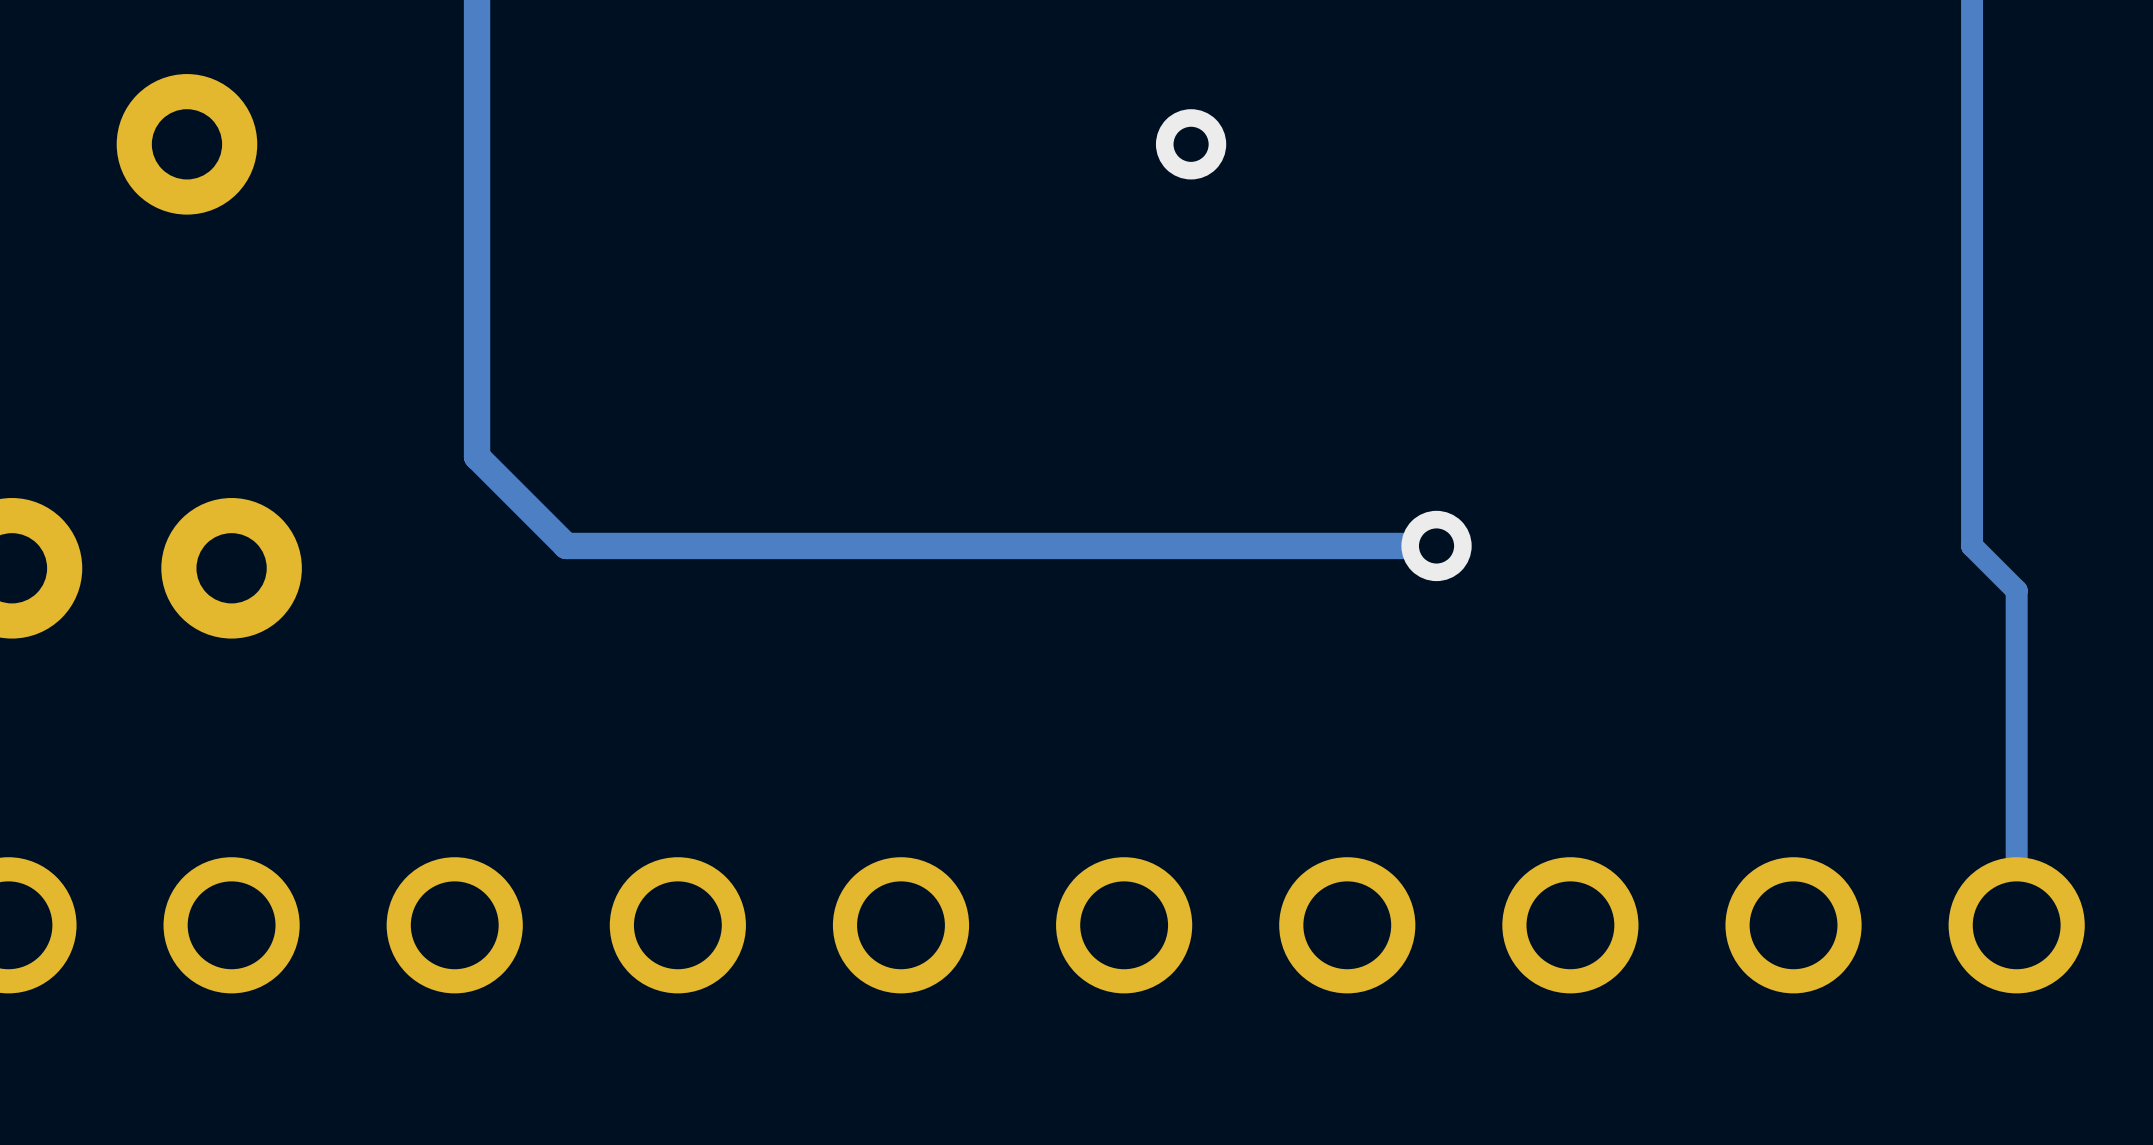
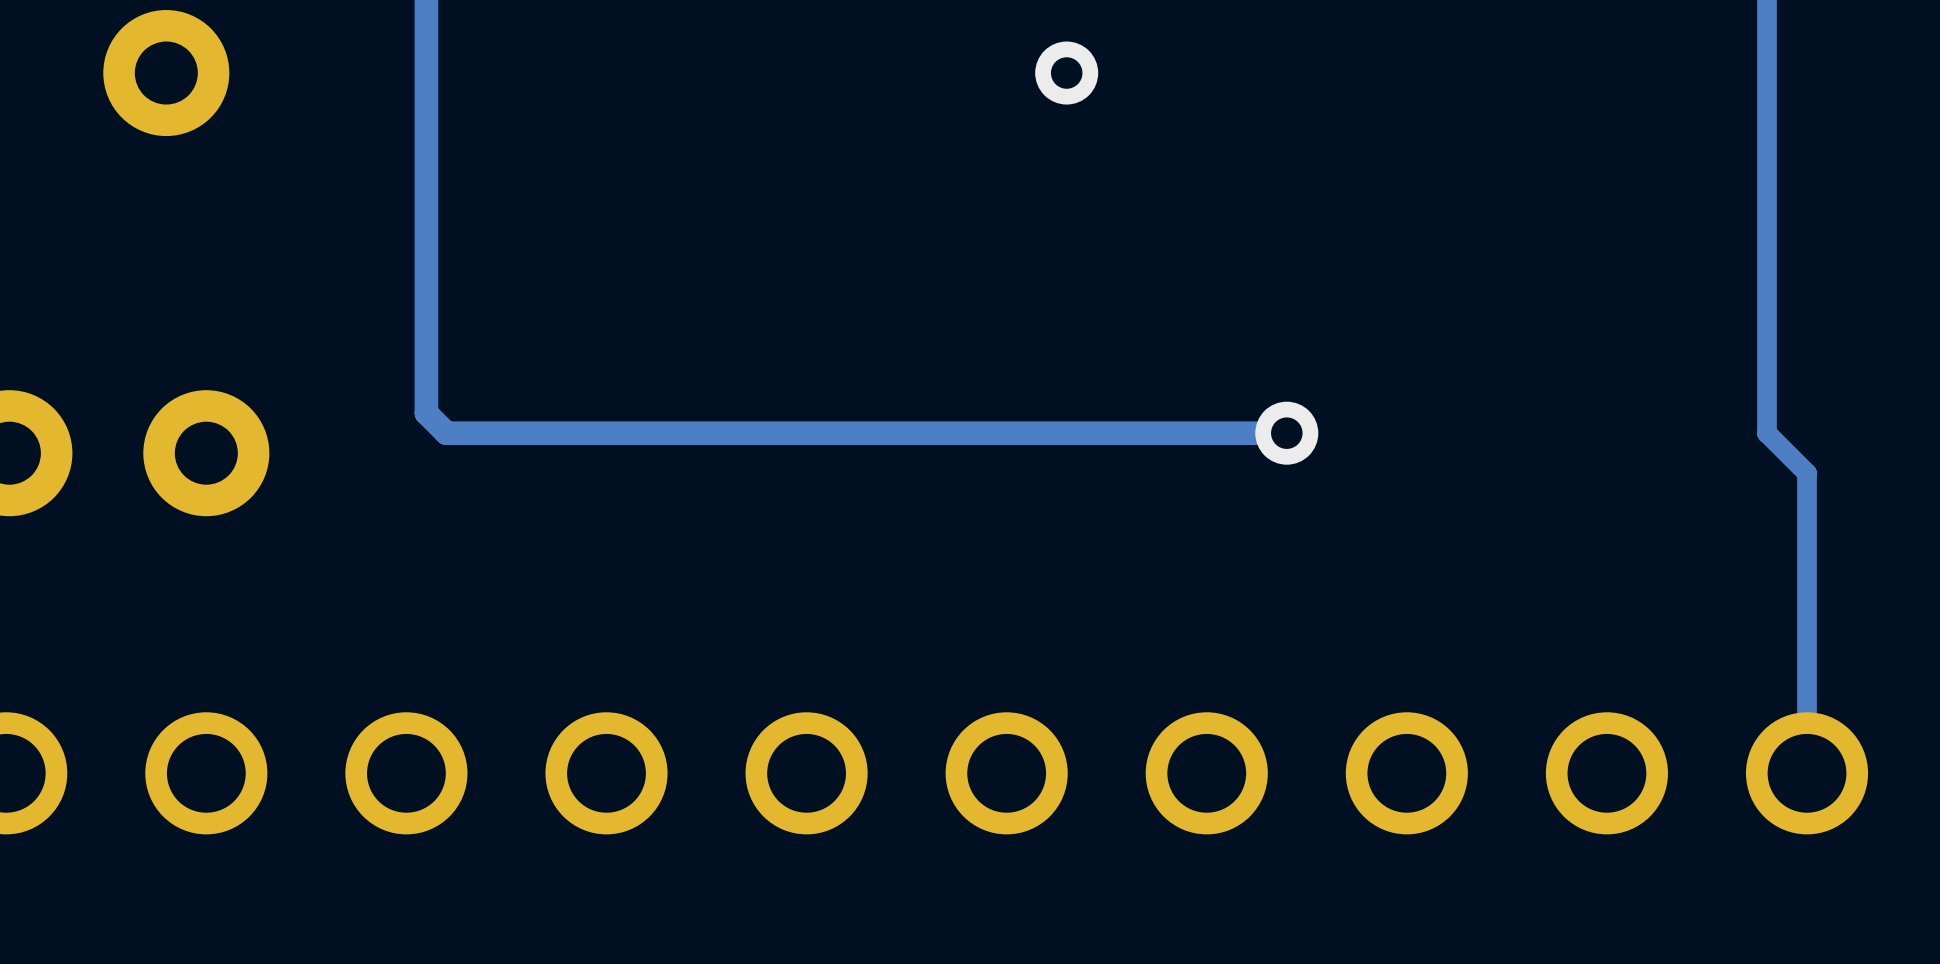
track: (477, 456) (566, 545) -> (426, 353) (426, 413) (446, 433) (506, 433)

